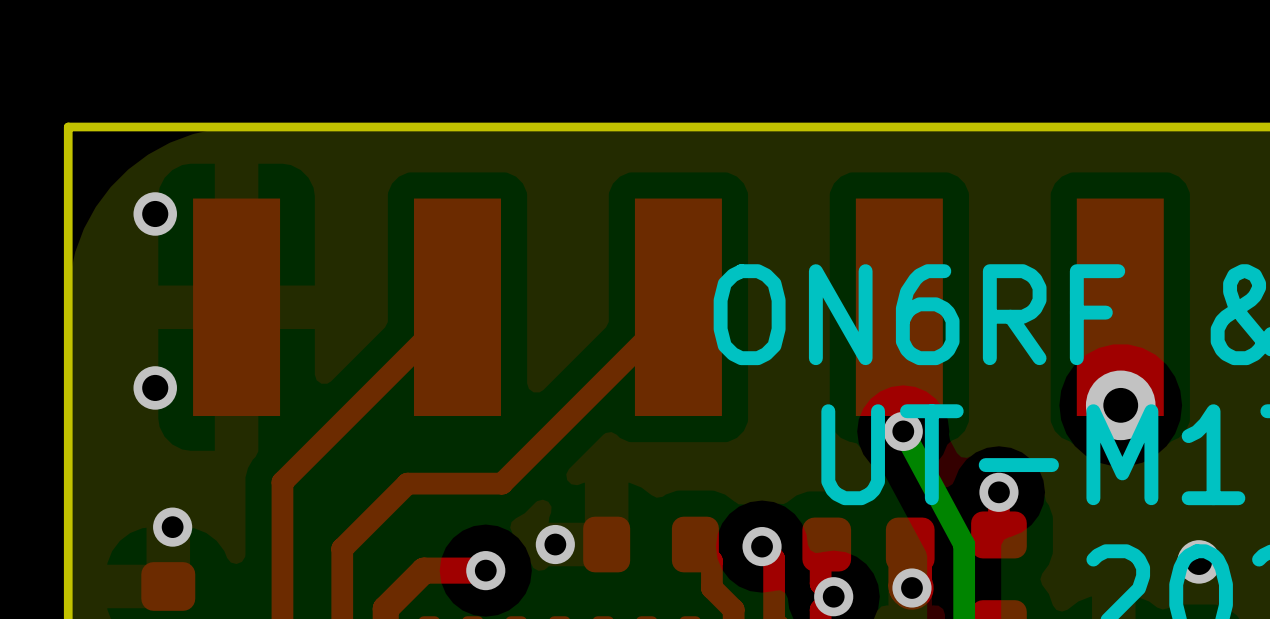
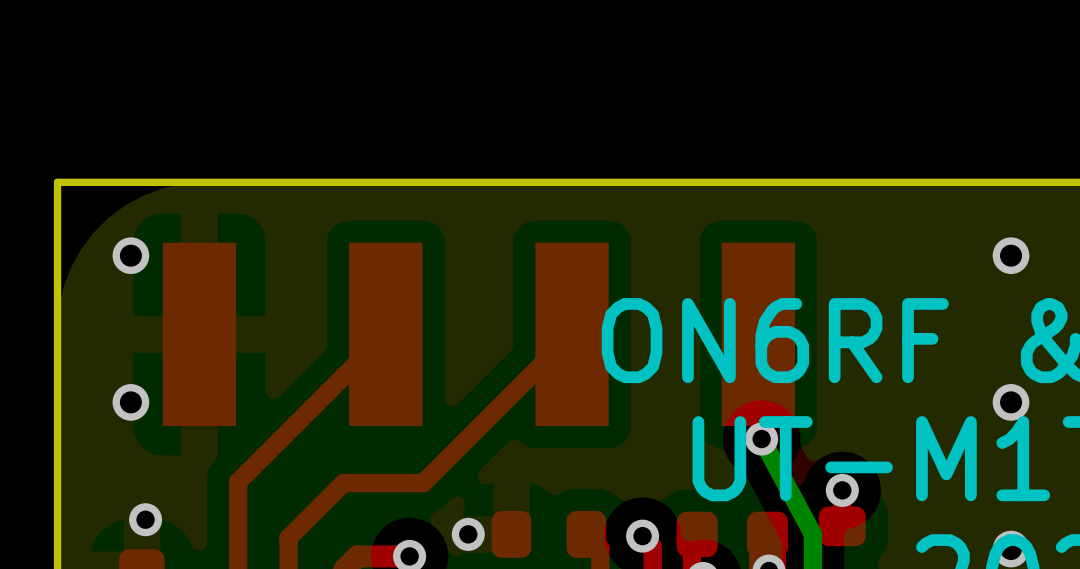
via: none -> (1011, 255)
part: (678, 307) -> none
via: none -> (1011, 402)
via: (1120, 405) -> none

